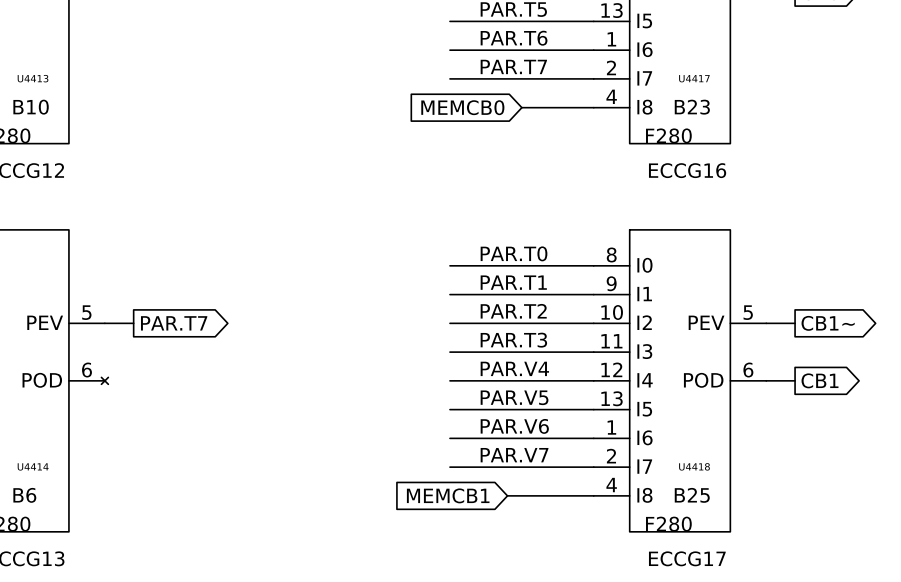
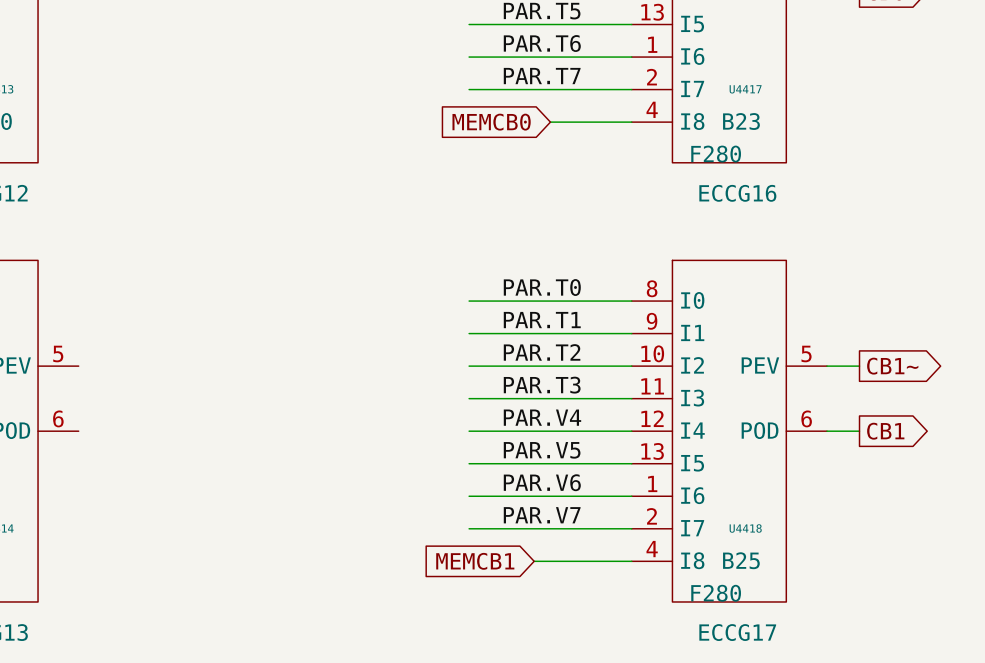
wire: (104, 323) (133, 323) -> none
global label: PAR.T7 (174, 323) -> none
no-connect mark: (104, 380) -> none

